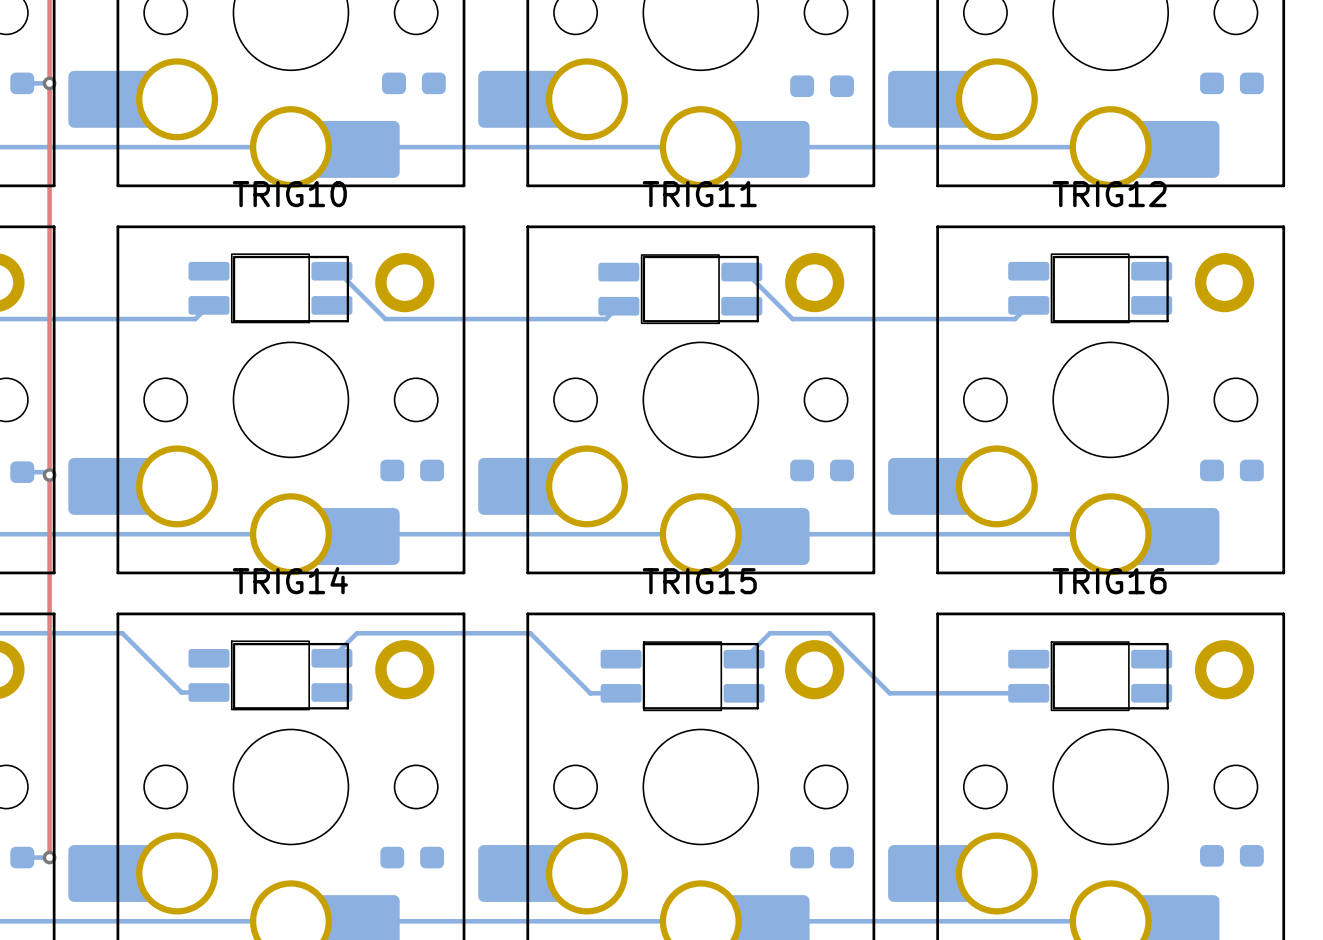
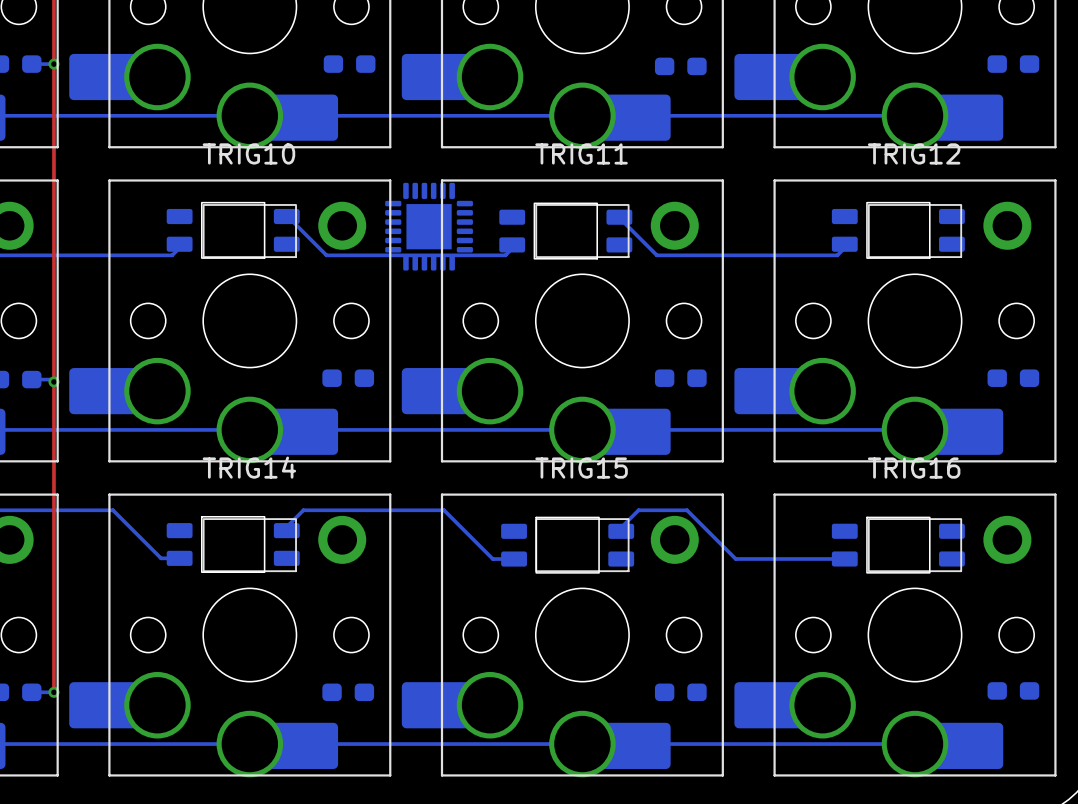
part footprint: [188, 253, 353, 324] -> [166, 202, 300, 259]
part footprint: [1008, 253, 1173, 324] -> [831, 202, 965, 259]
part footprint: [598, 254, 763, 324] -> [499, 202, 633, 260]
part: none -> (429, 226)
part footprint: [188, 640, 353, 711] -> [166, 516, 300, 573]
part footprint: [600, 641, 765, 711] -> [501, 516, 635, 574]
part footprint: [1008, 641, 1173, 711] -> [831, 516, 965, 574]

